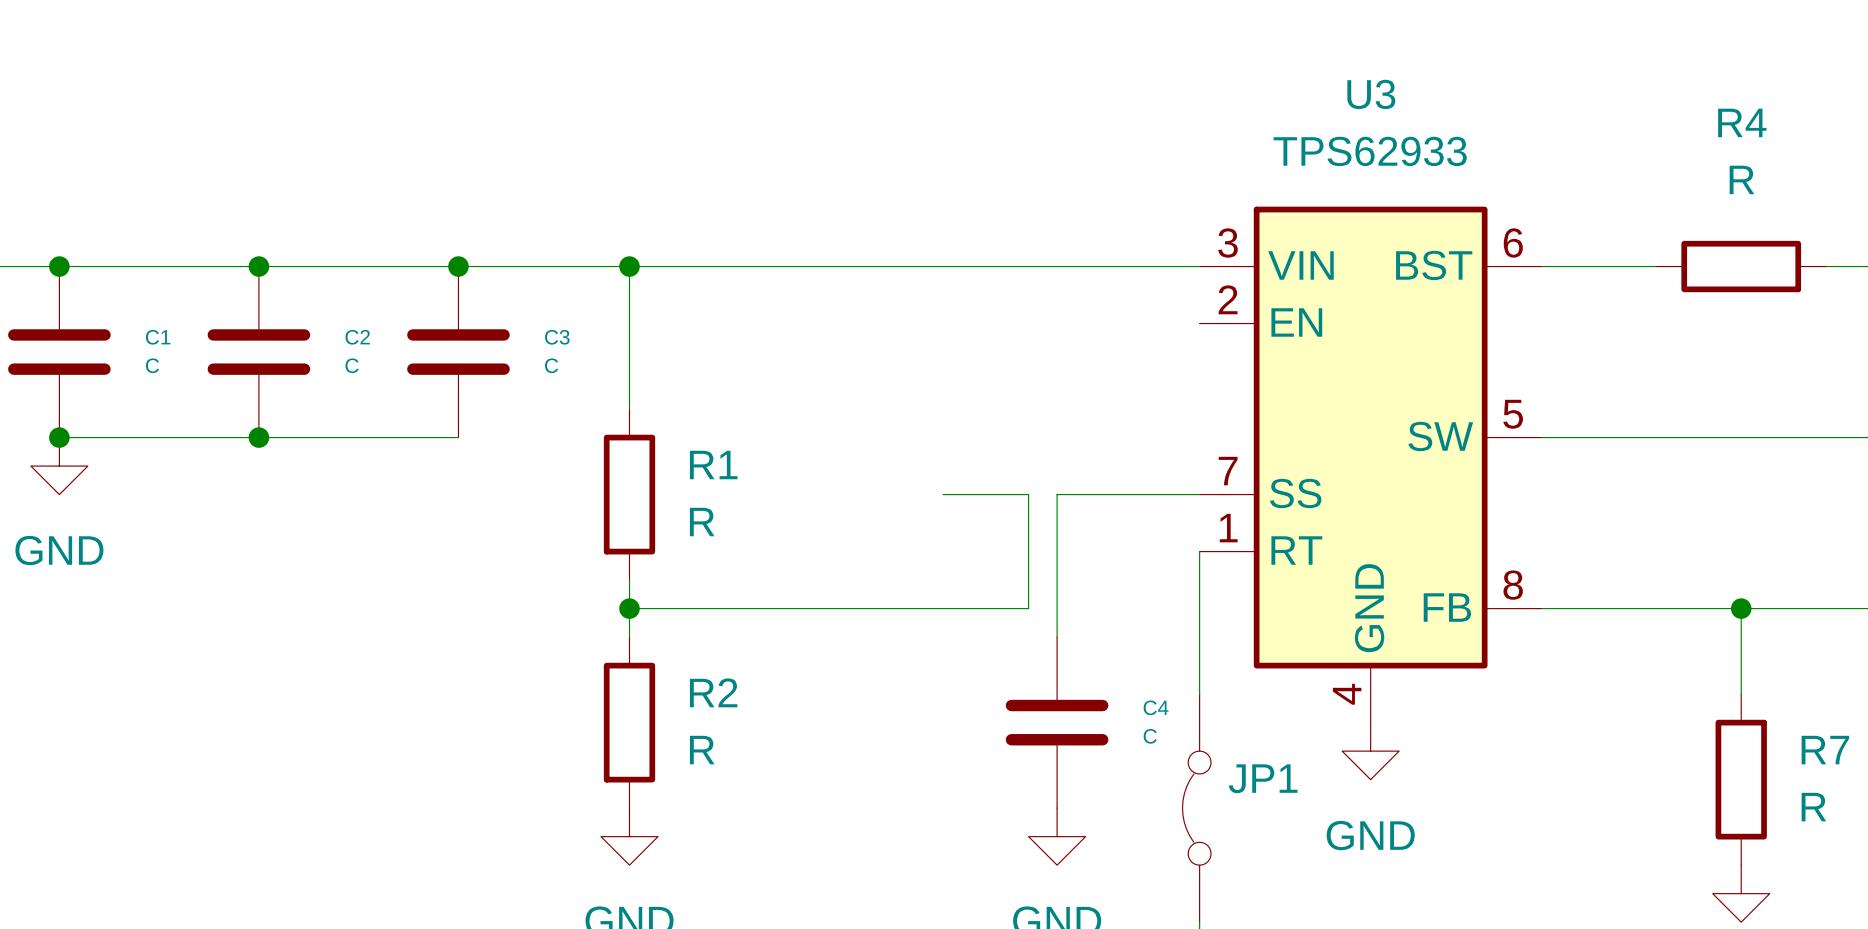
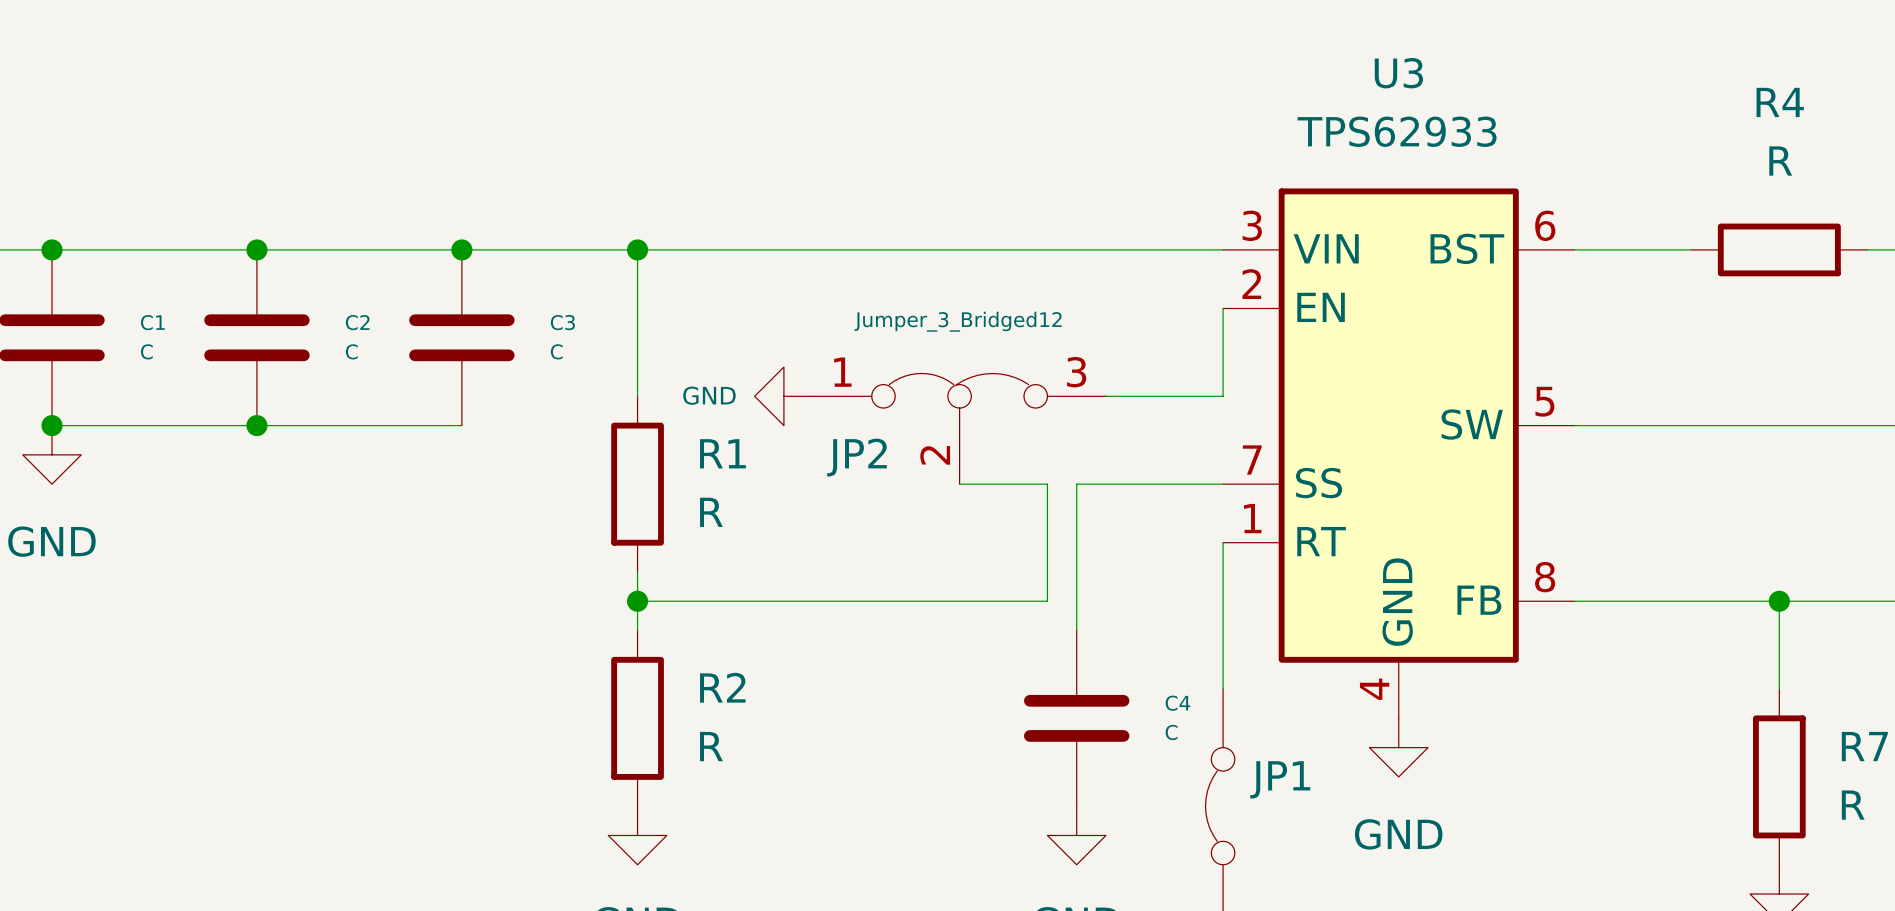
wire: none -> (1223, 308) (1223, 396) (1105, 396)
power symbol: none -> GND (783, 396)
JP2: none -> Jumper_3_Bridged12 (959, 428)

